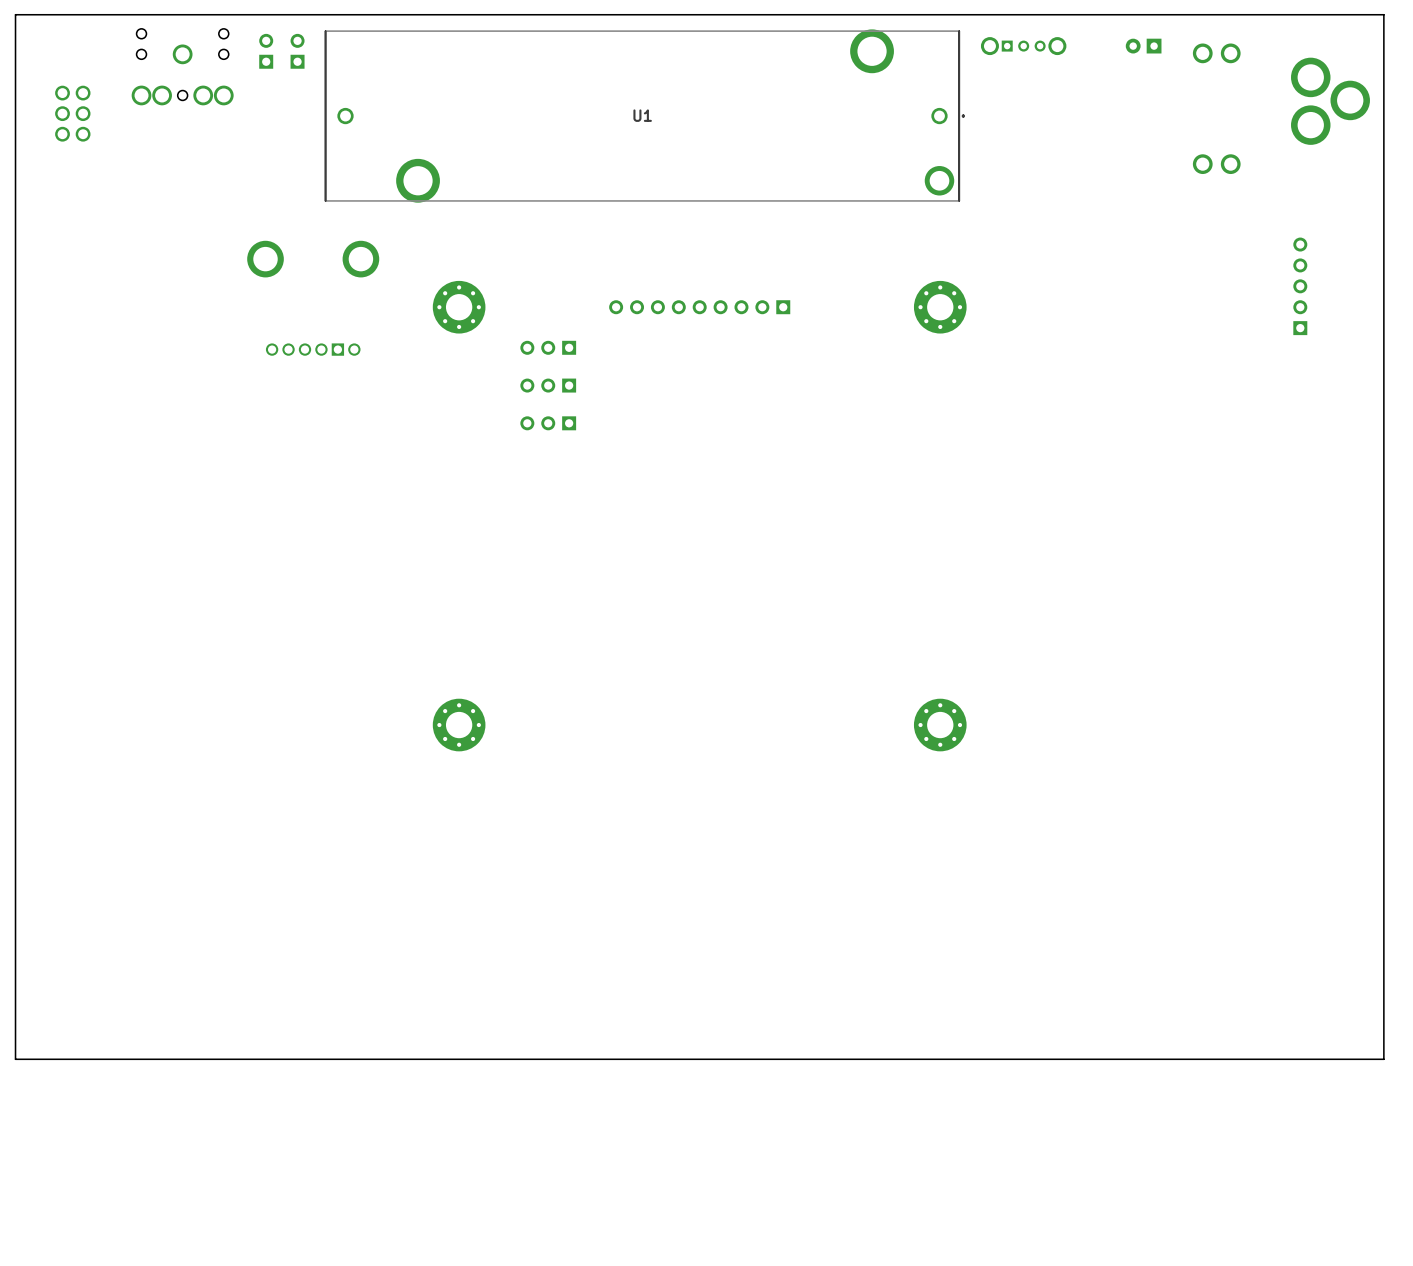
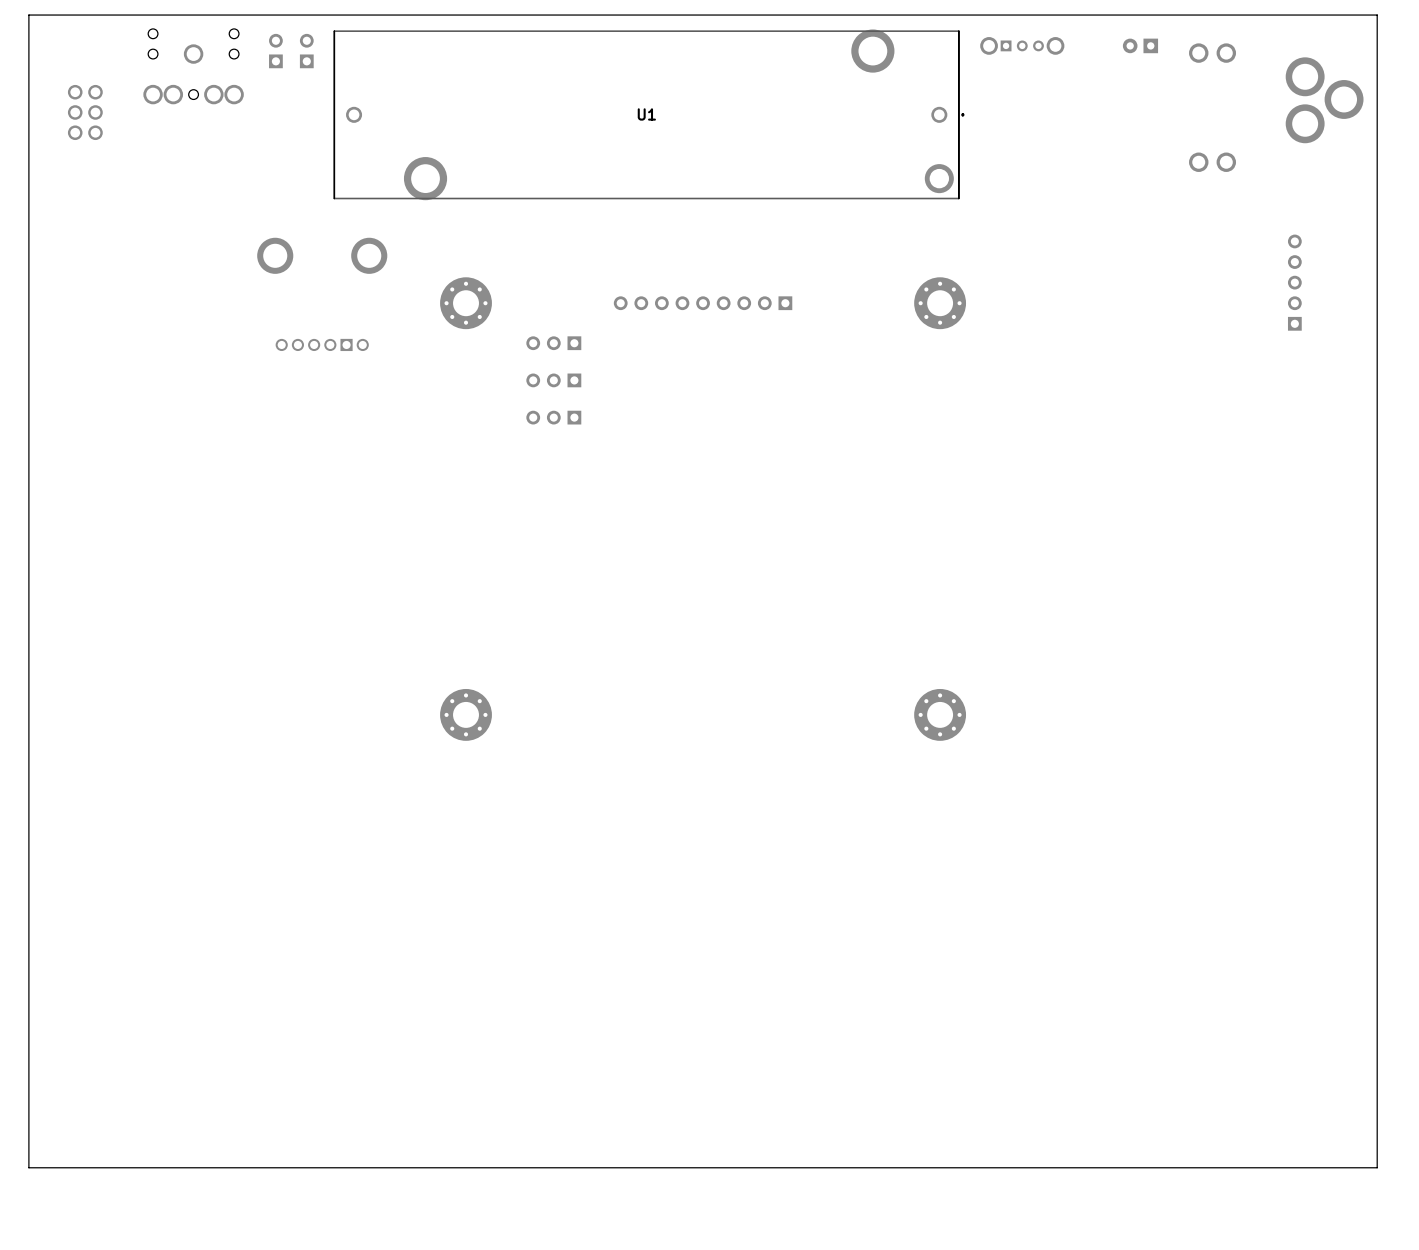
board edge: (1383, 1059) (15, 1059) -> (1377, 1044) (1377, 1167) (28, 1167) (28, 1044)

